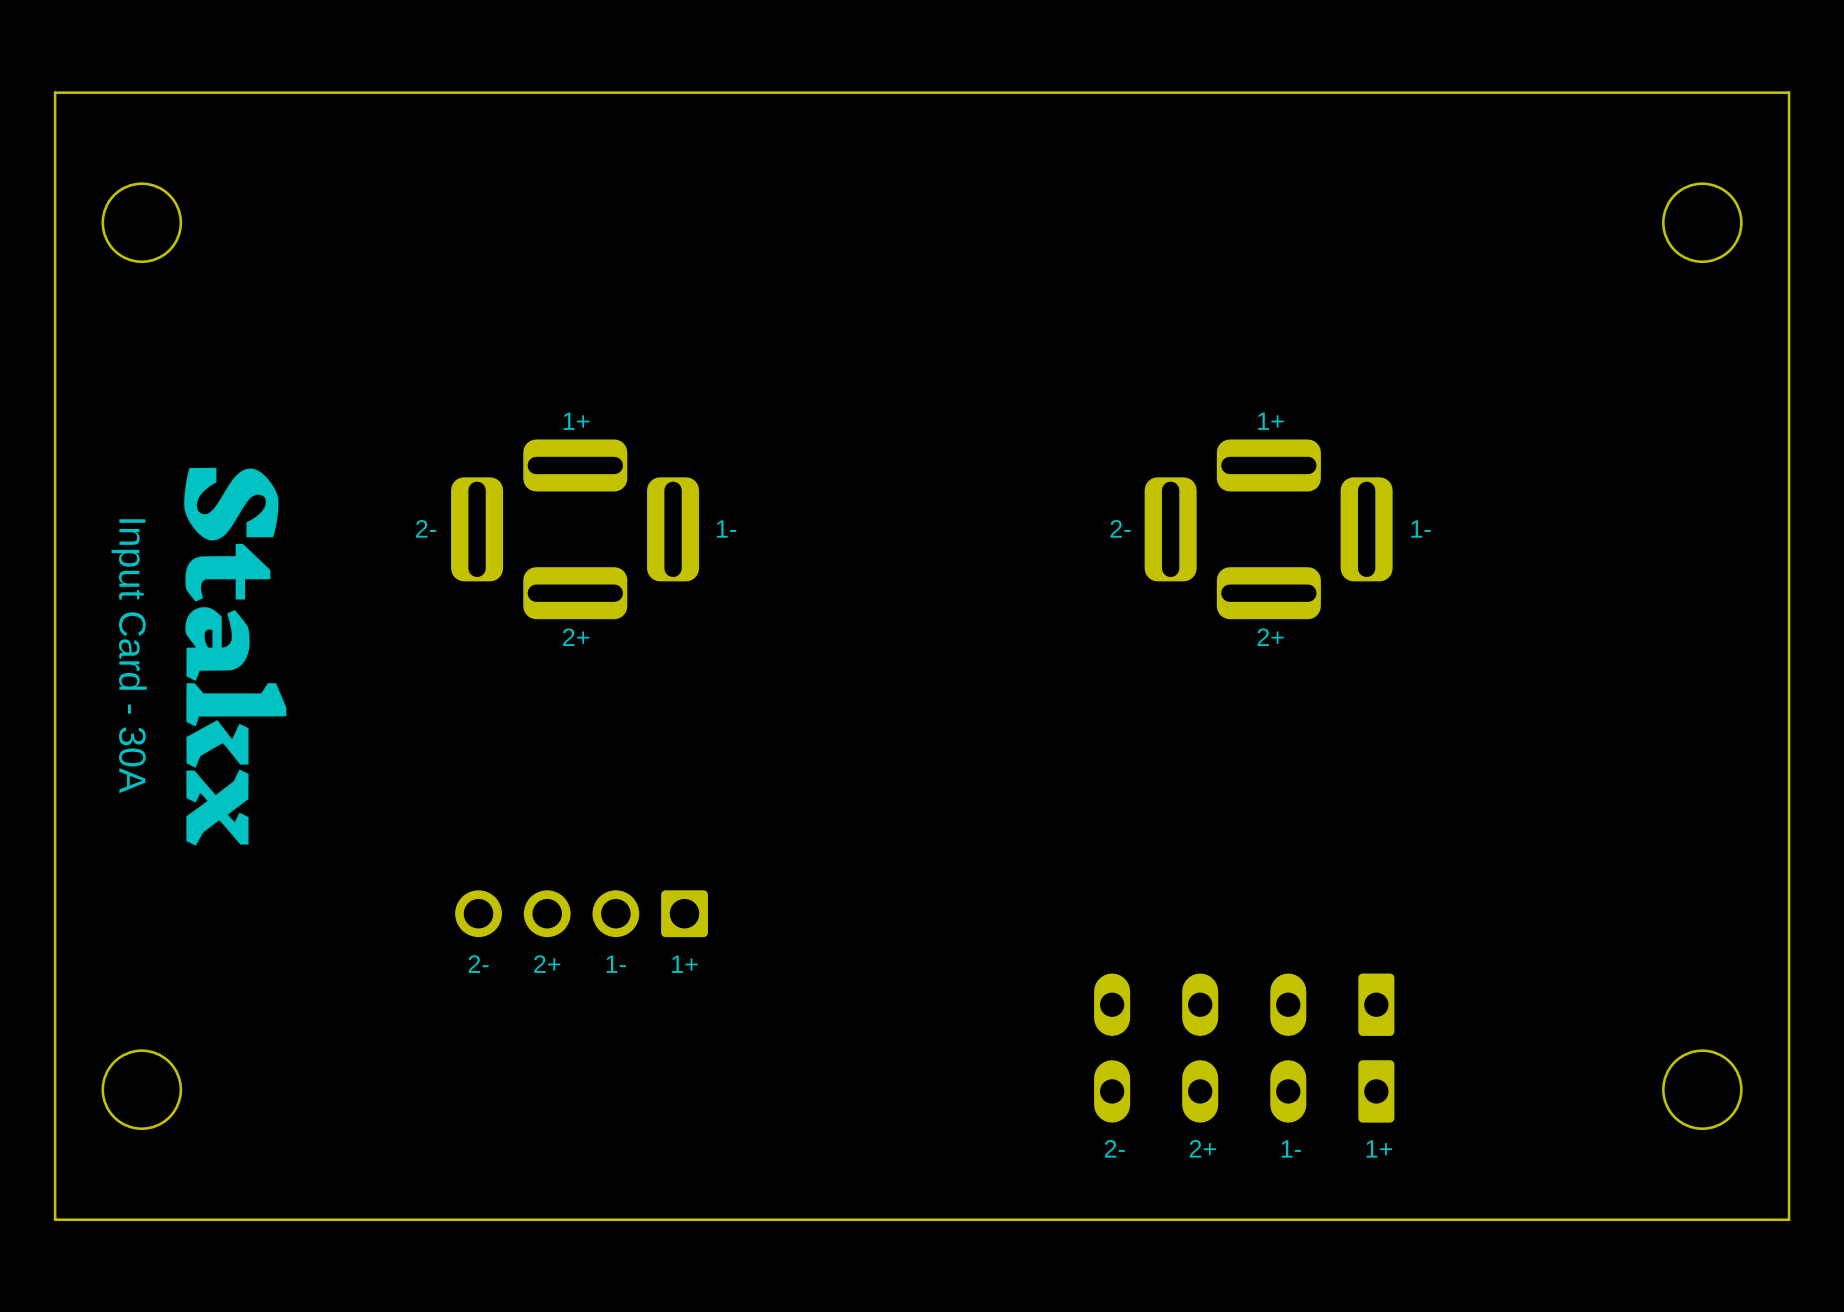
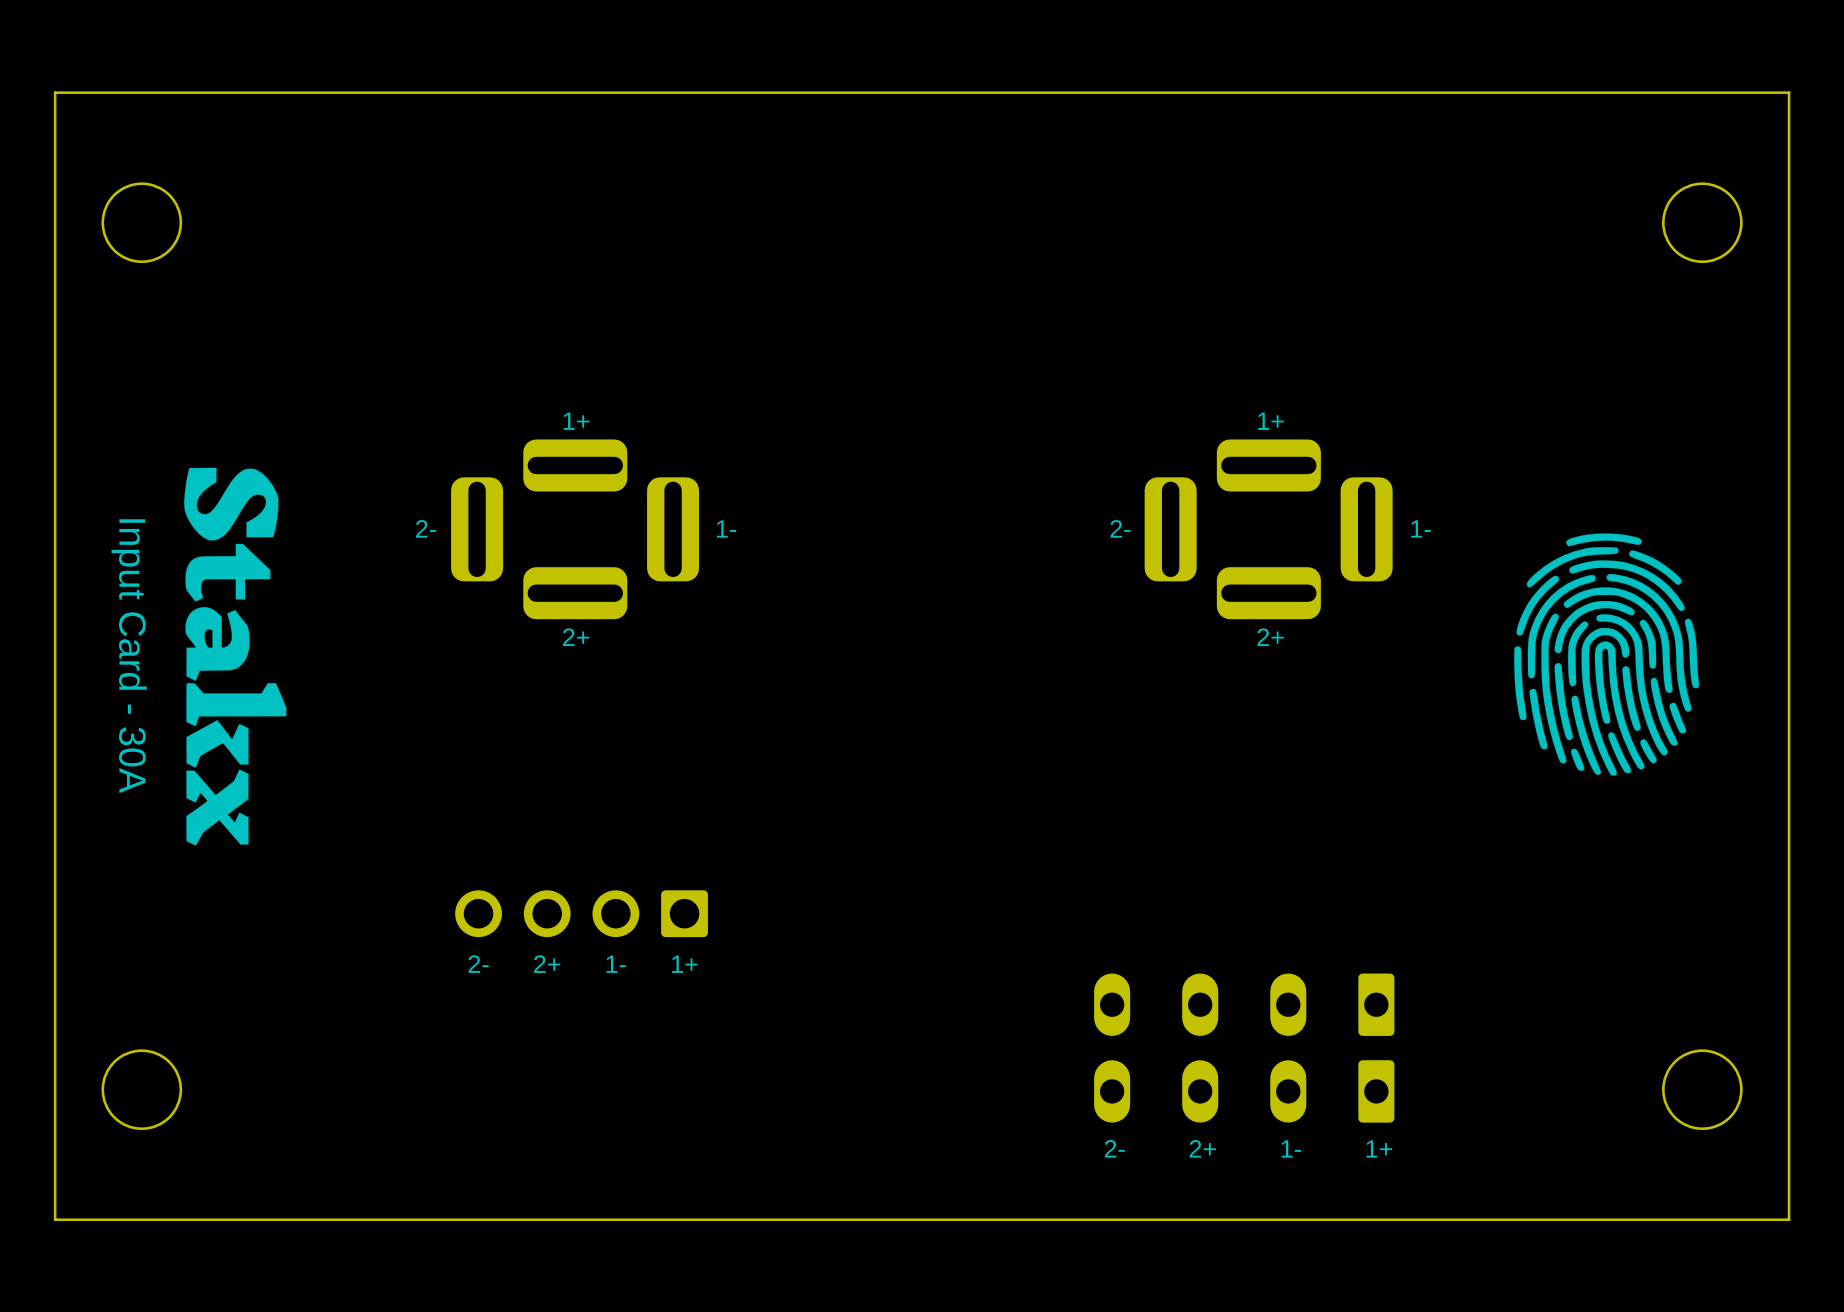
drawing: none -> [1514, 533, 1699, 776]

